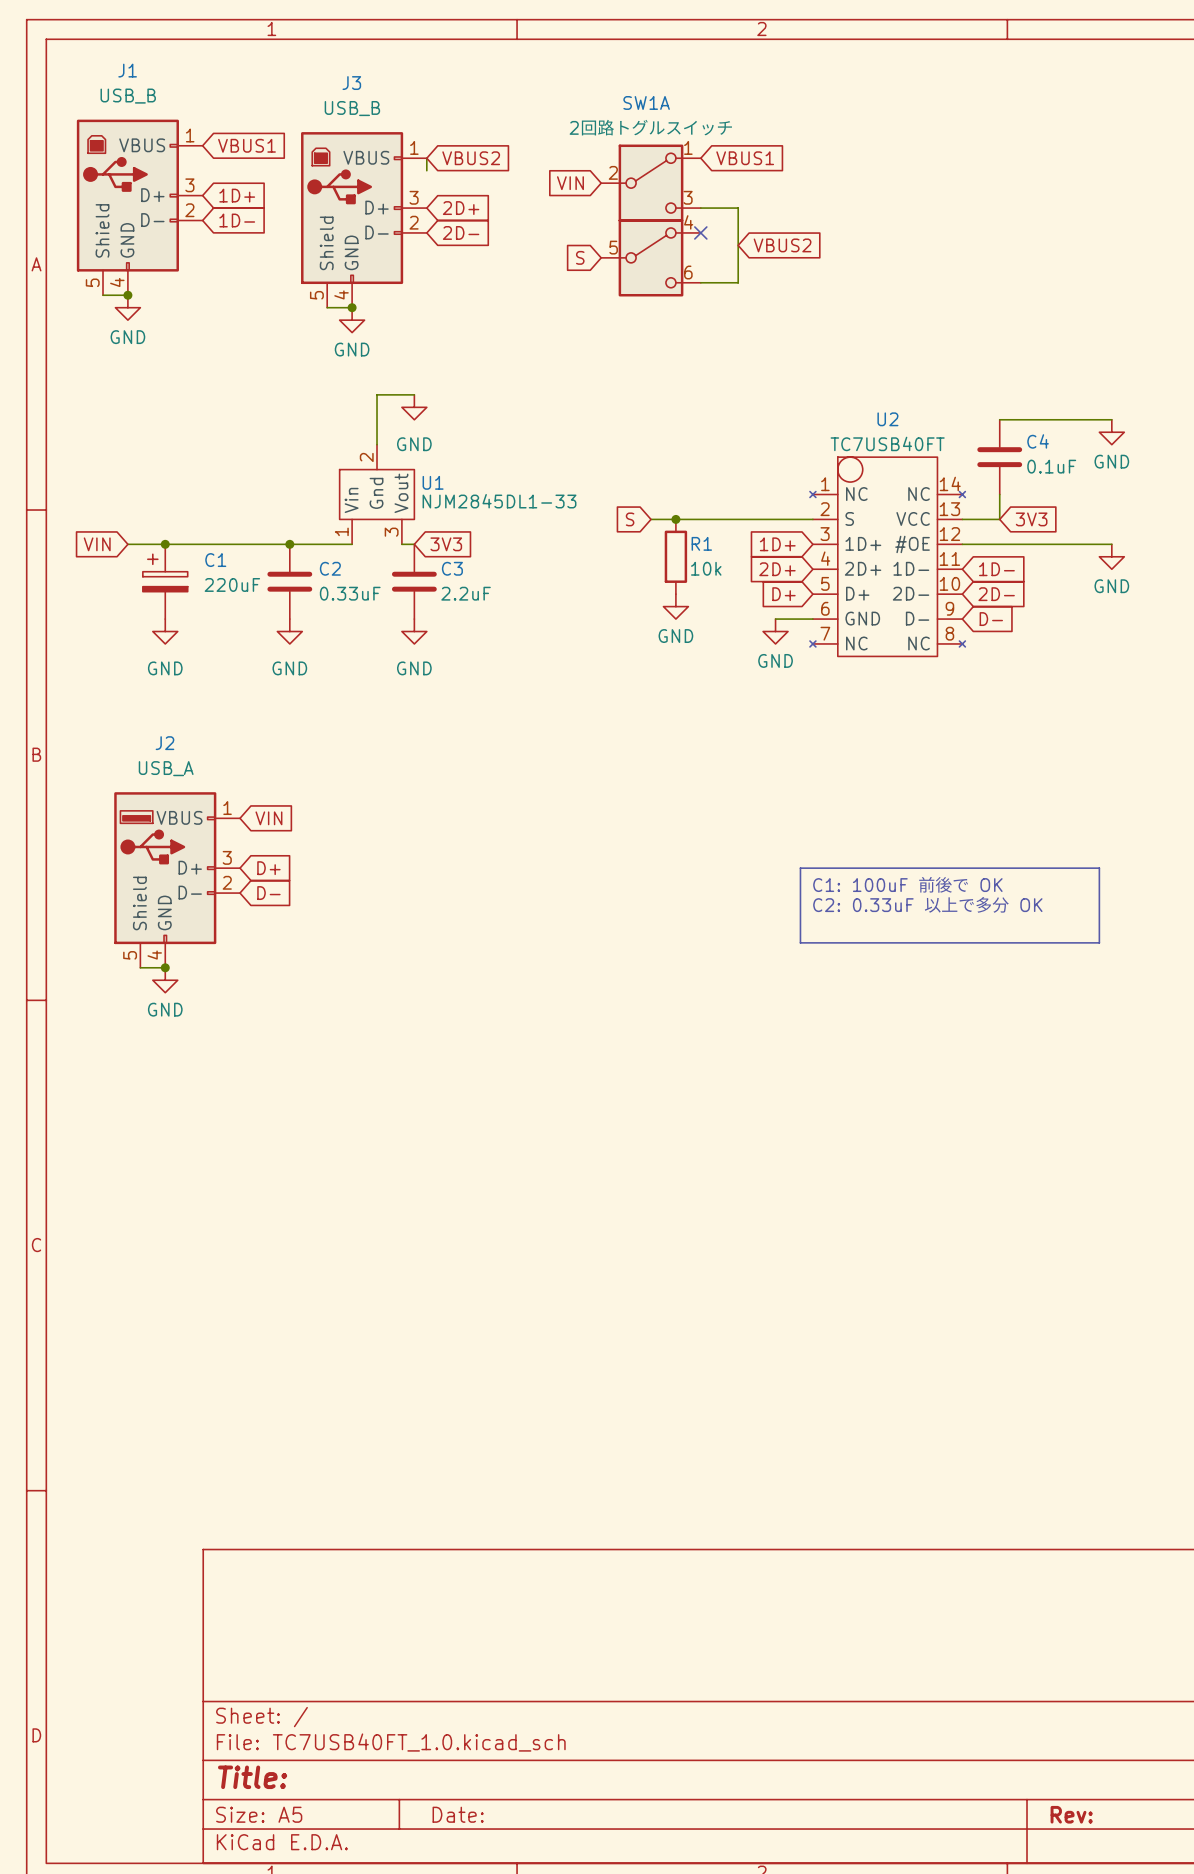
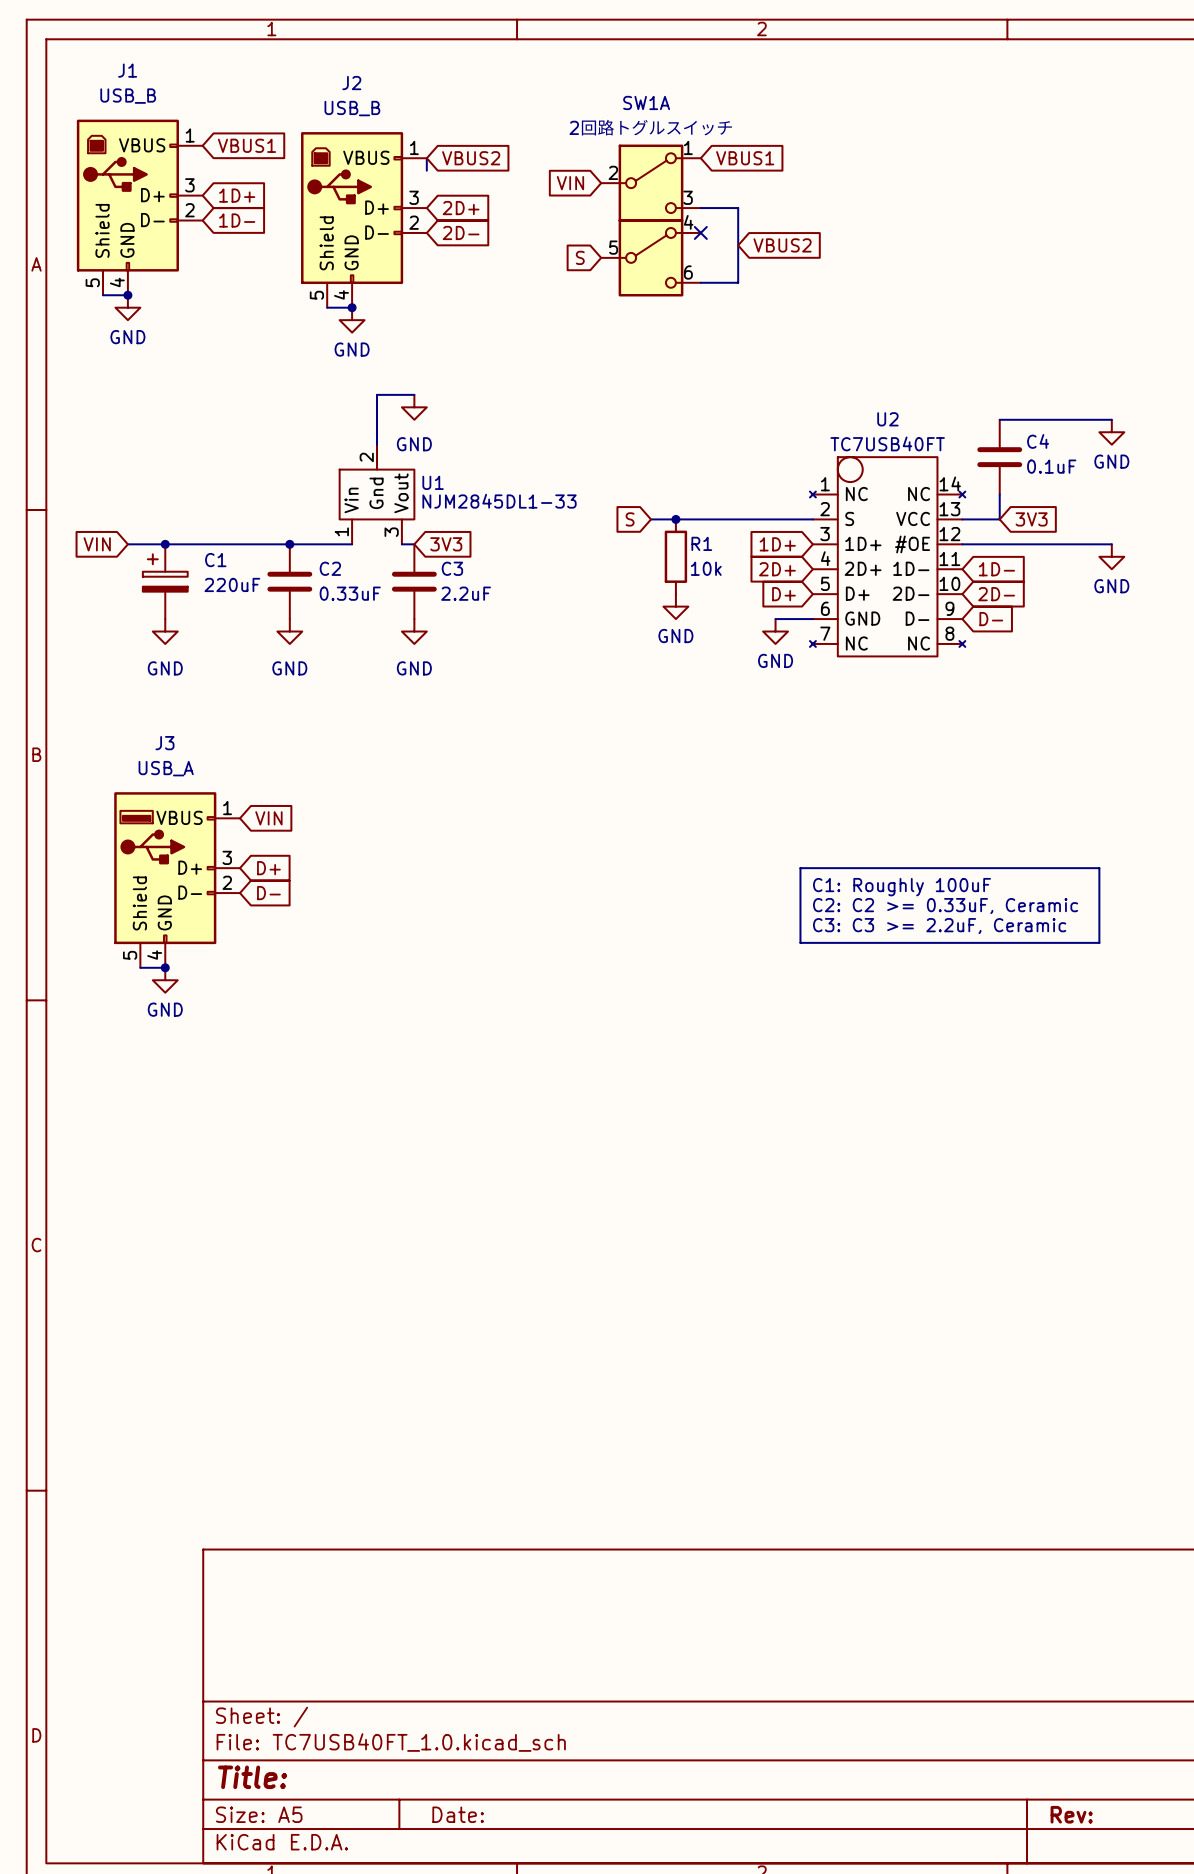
J3 name: J3 (351, 83) -> J2 (351, 83)
J2 name: J2 (164, 743) -> J3 (164, 743)
text: C1: 100uF 前後で OK (907, 884) -> C1: Roughly 100uF (901, 887)
text: C2: 0.33uF 以上で多分 OK (927, 904) -> C2: C2 >= 0.33uF, Ceramic (945, 906)
text: none -> C3: C3 >= 2.2uF, Ceramic (939, 926)

